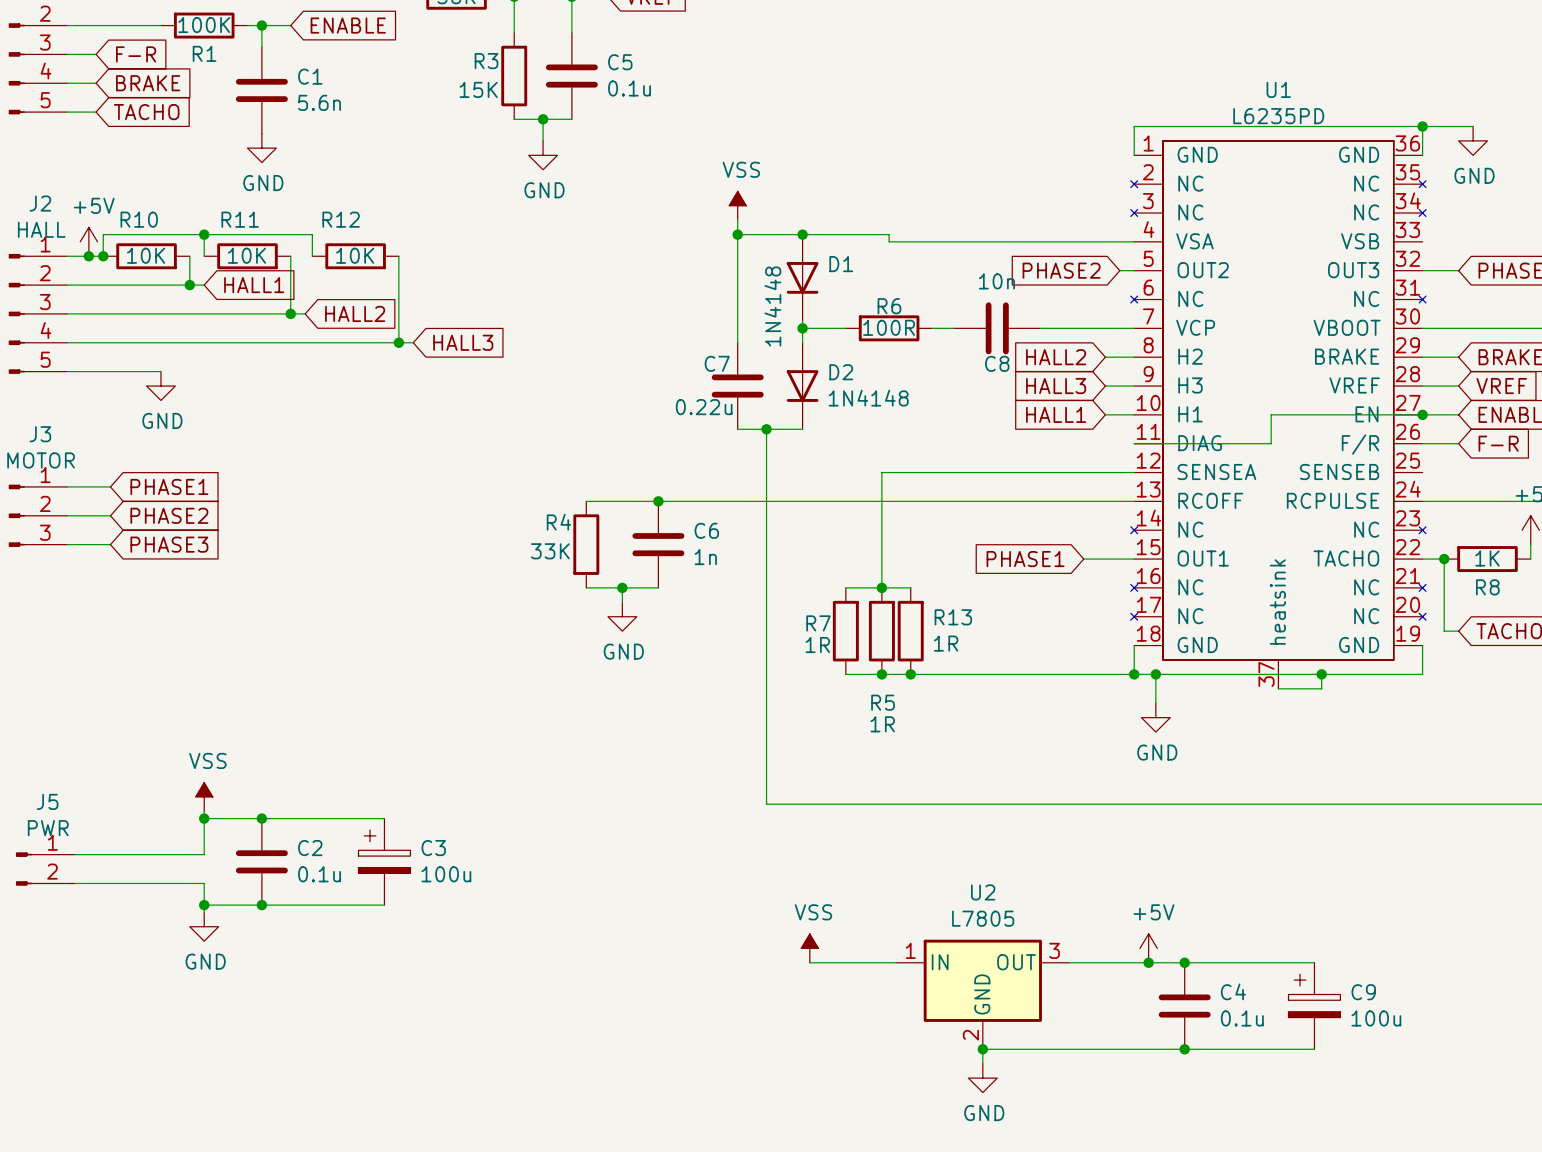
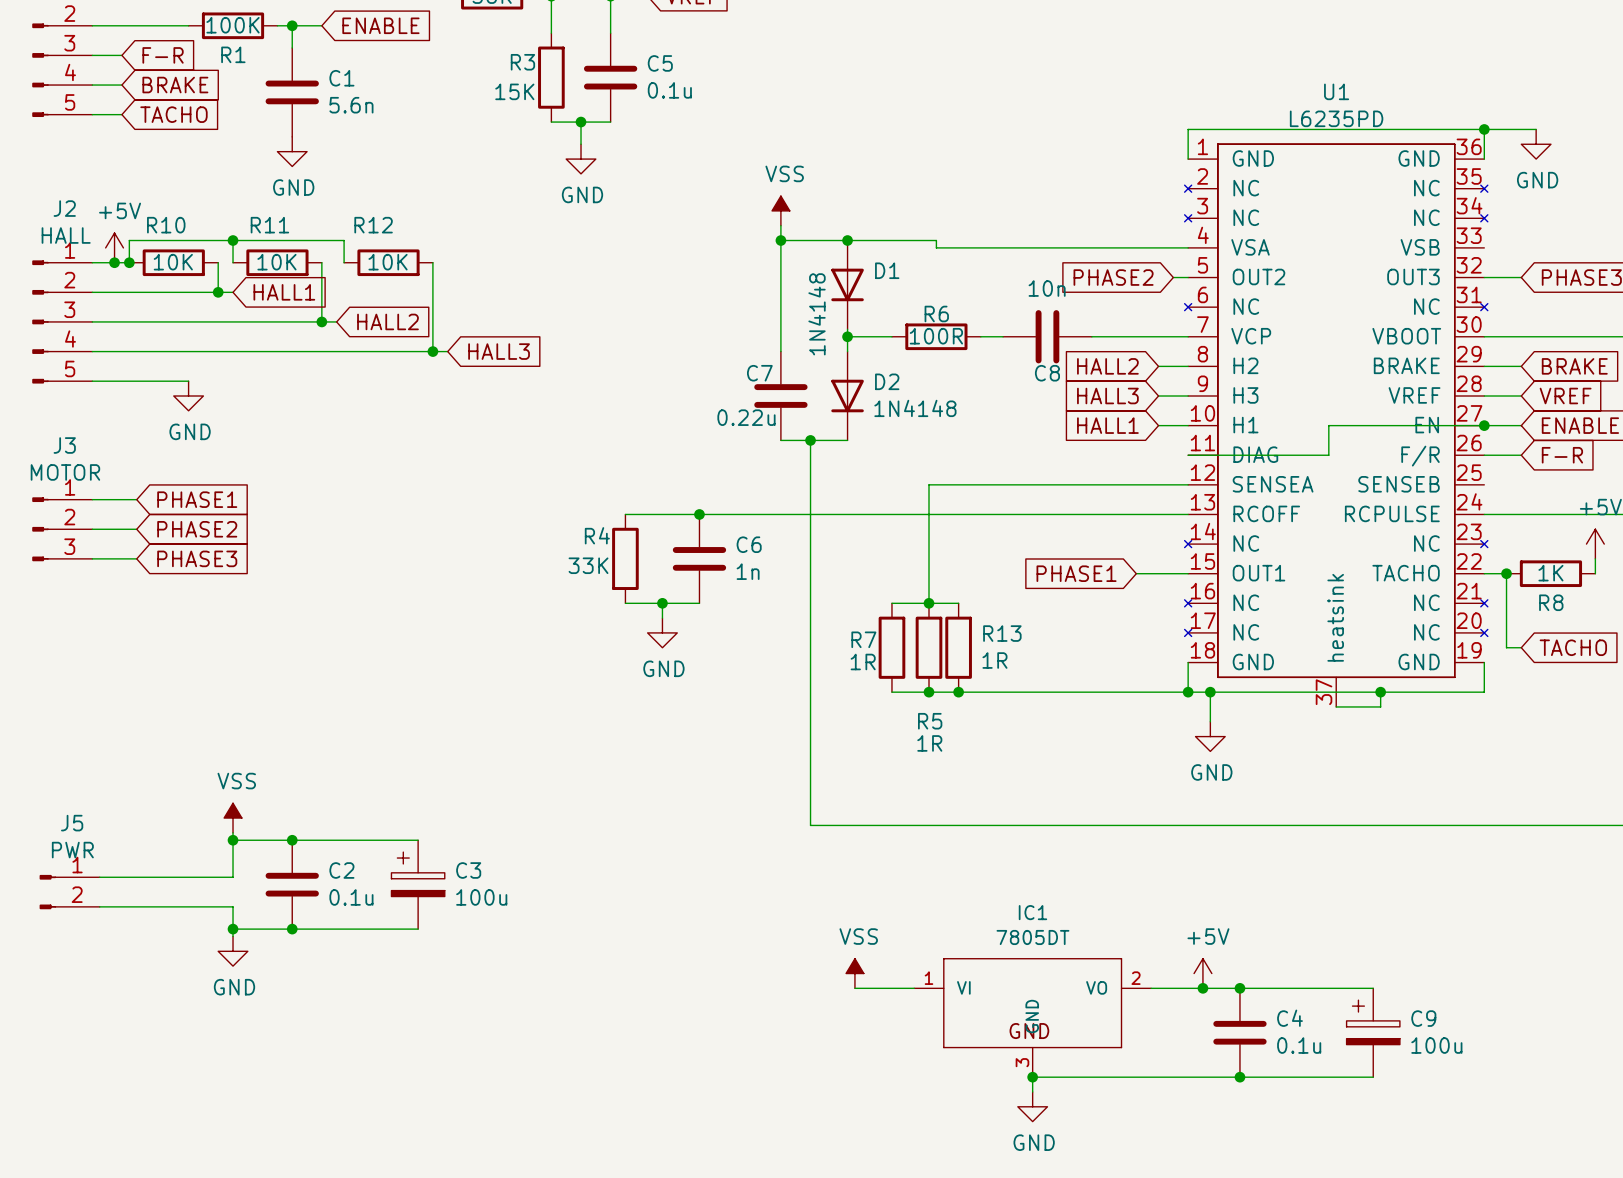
IC1: none -> 7805DT (1032, 1017)
U2: L7805 (982, 994) -> none

